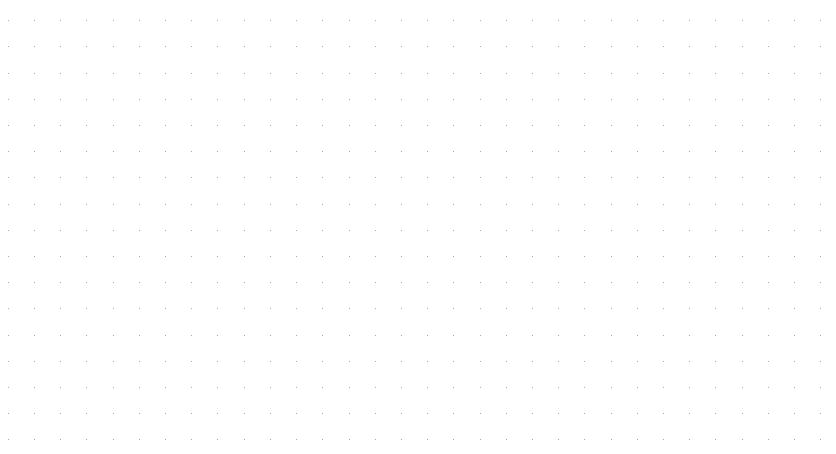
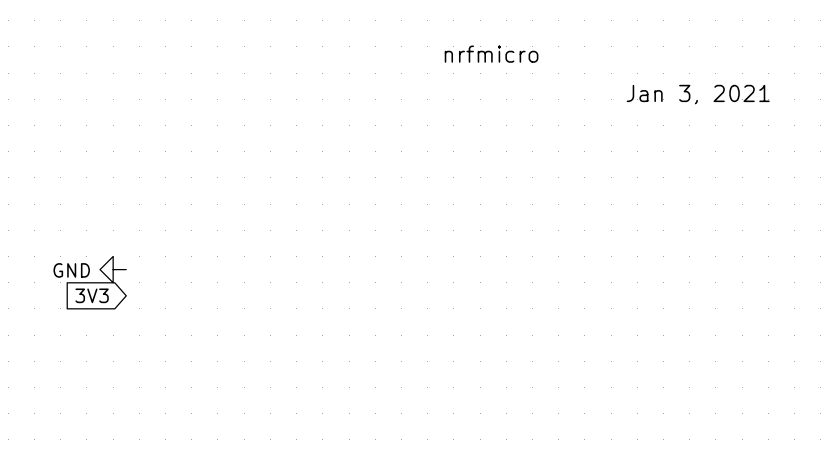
text: none -> nrfmicro (491, 54)
text: none -> Jan 3, 2021 (698, 94)
power symbol: none -> GND (113, 269)
global label: none -> 3V3 (92, 295)

